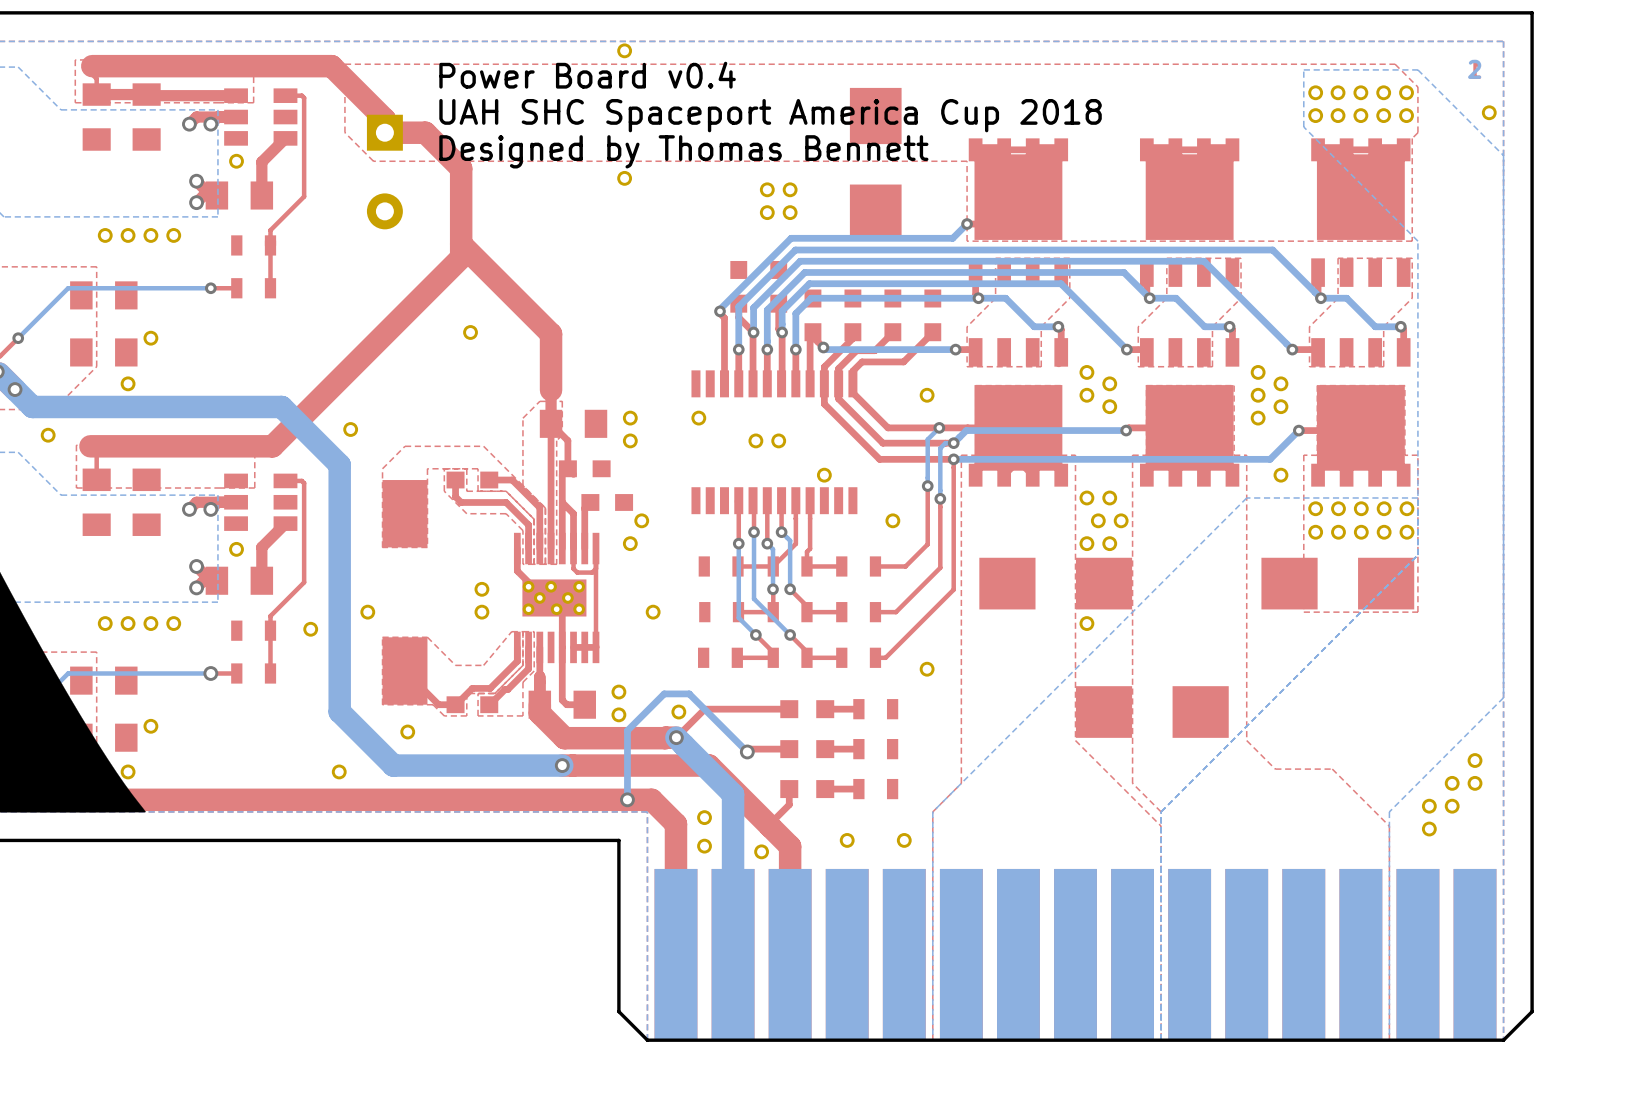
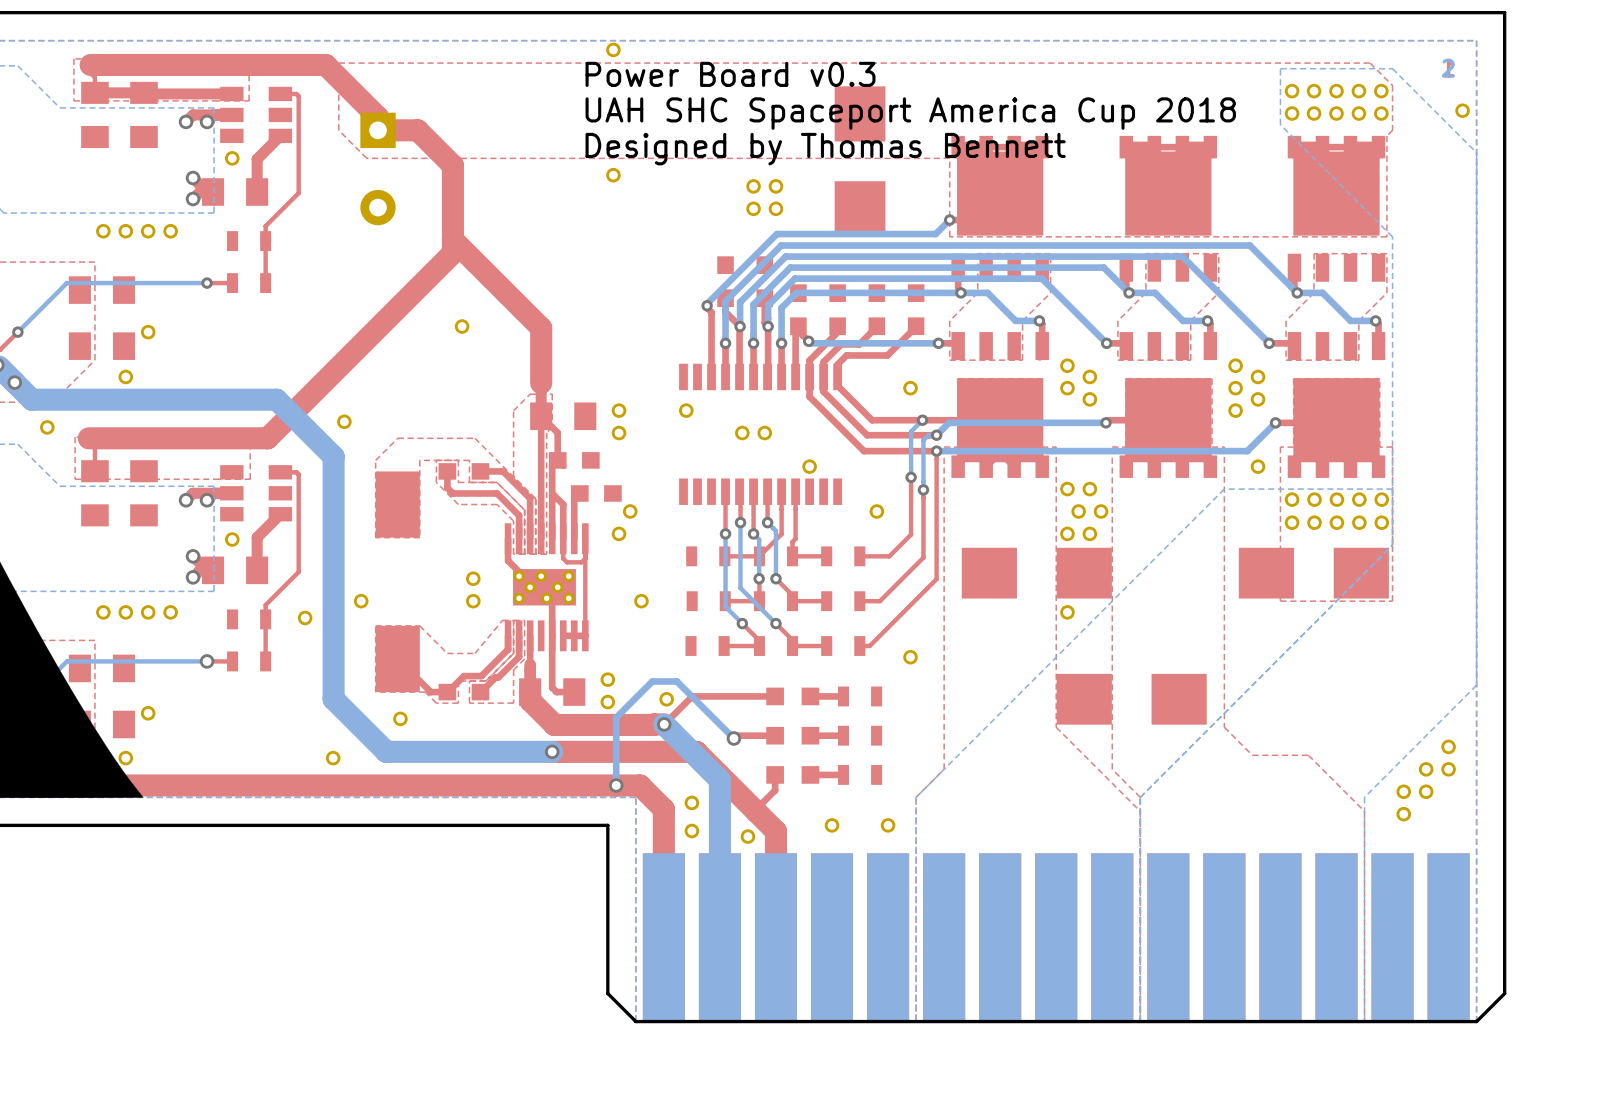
text: Power Board v0.4 (587, 75) -> Power Board v0.3 (730, 74)
text position: UAH SHC Spaceport America Cup 2018 (770, 115) -> UAH SHC Spaceport America Cup 2018 (910, 113)
text position: Designed by Thomas Bennett (683, 151) -> Designed by Thomas Bennett (825, 149)

